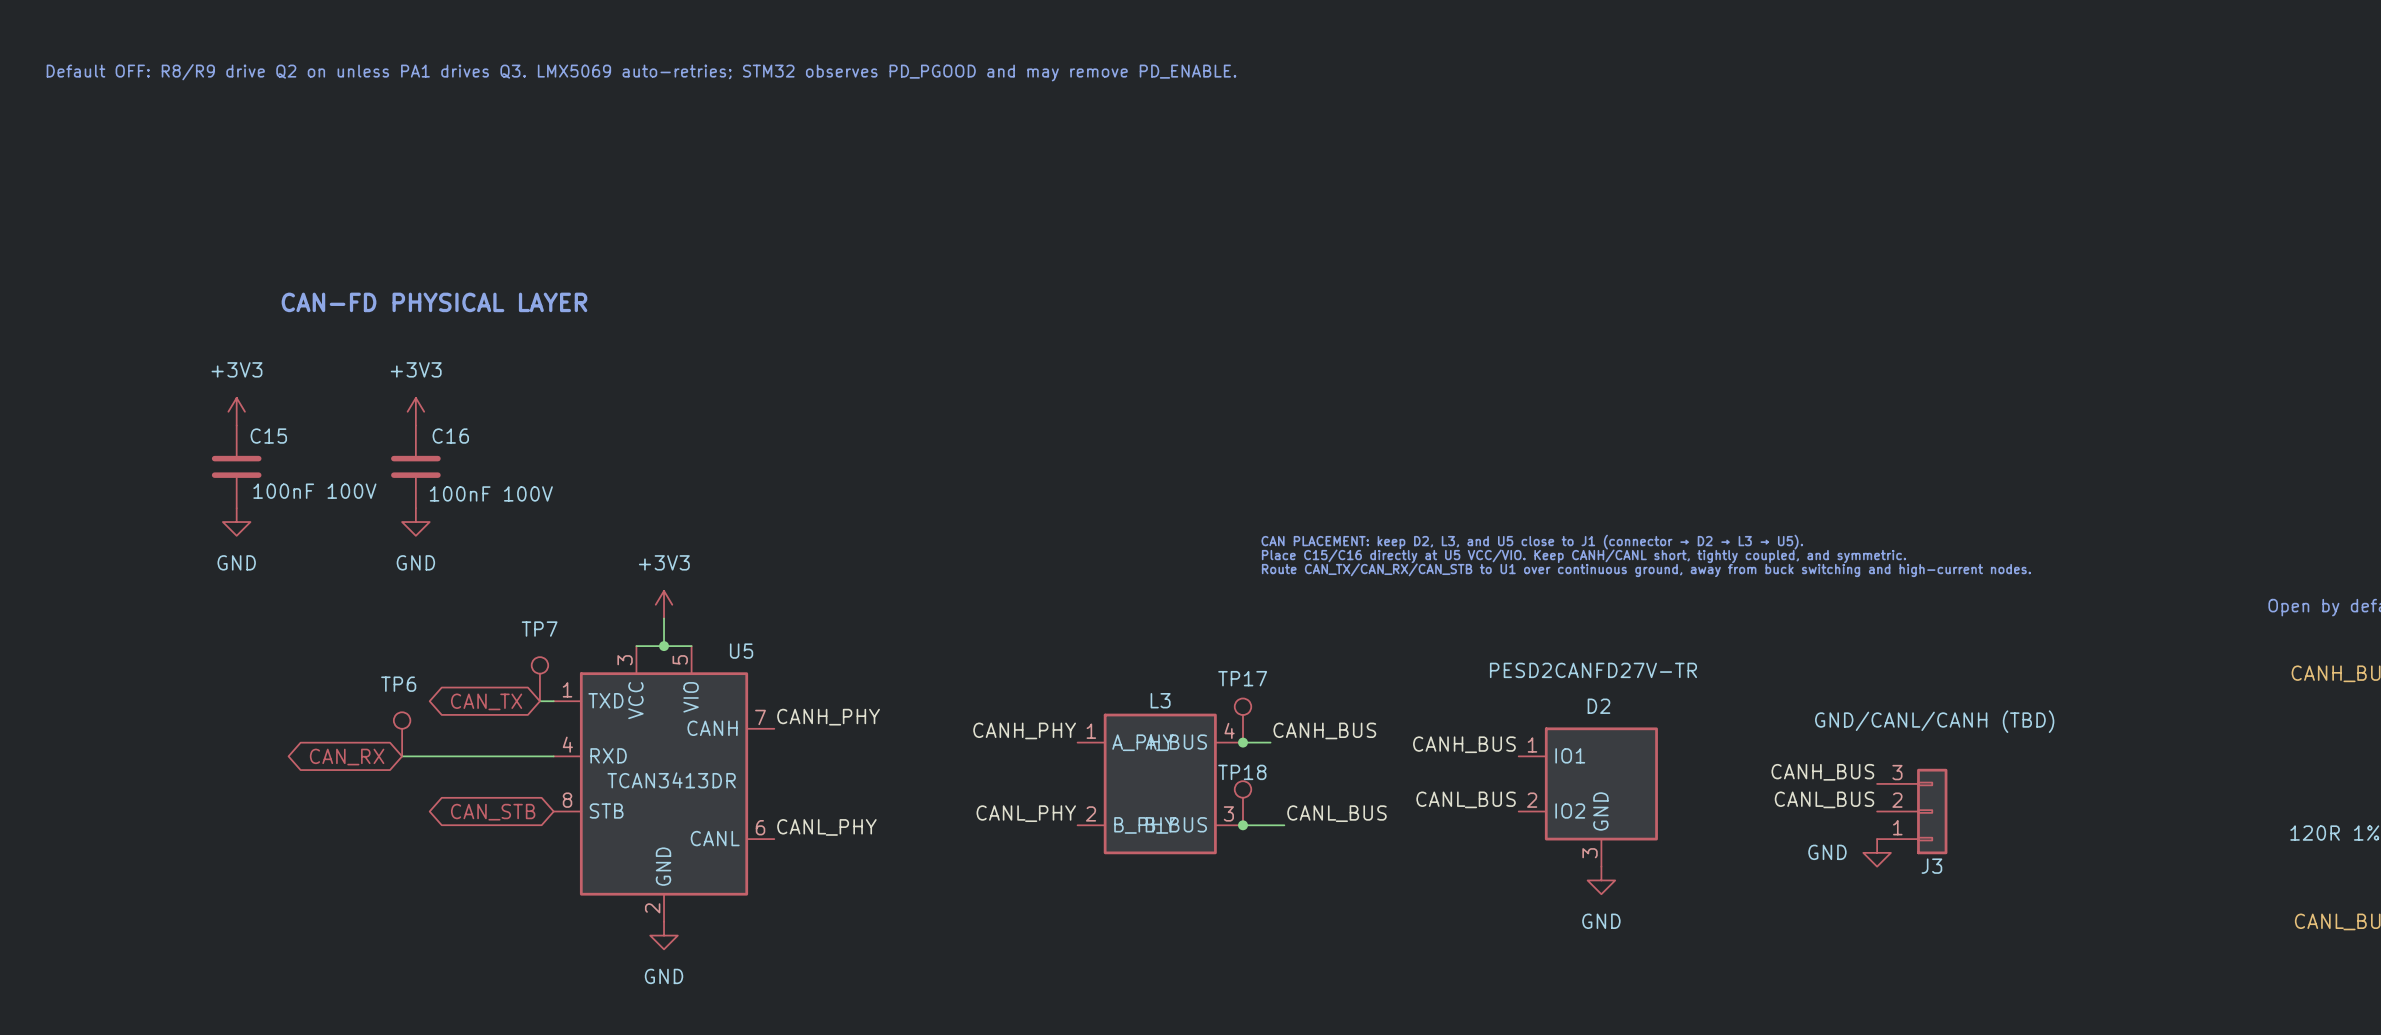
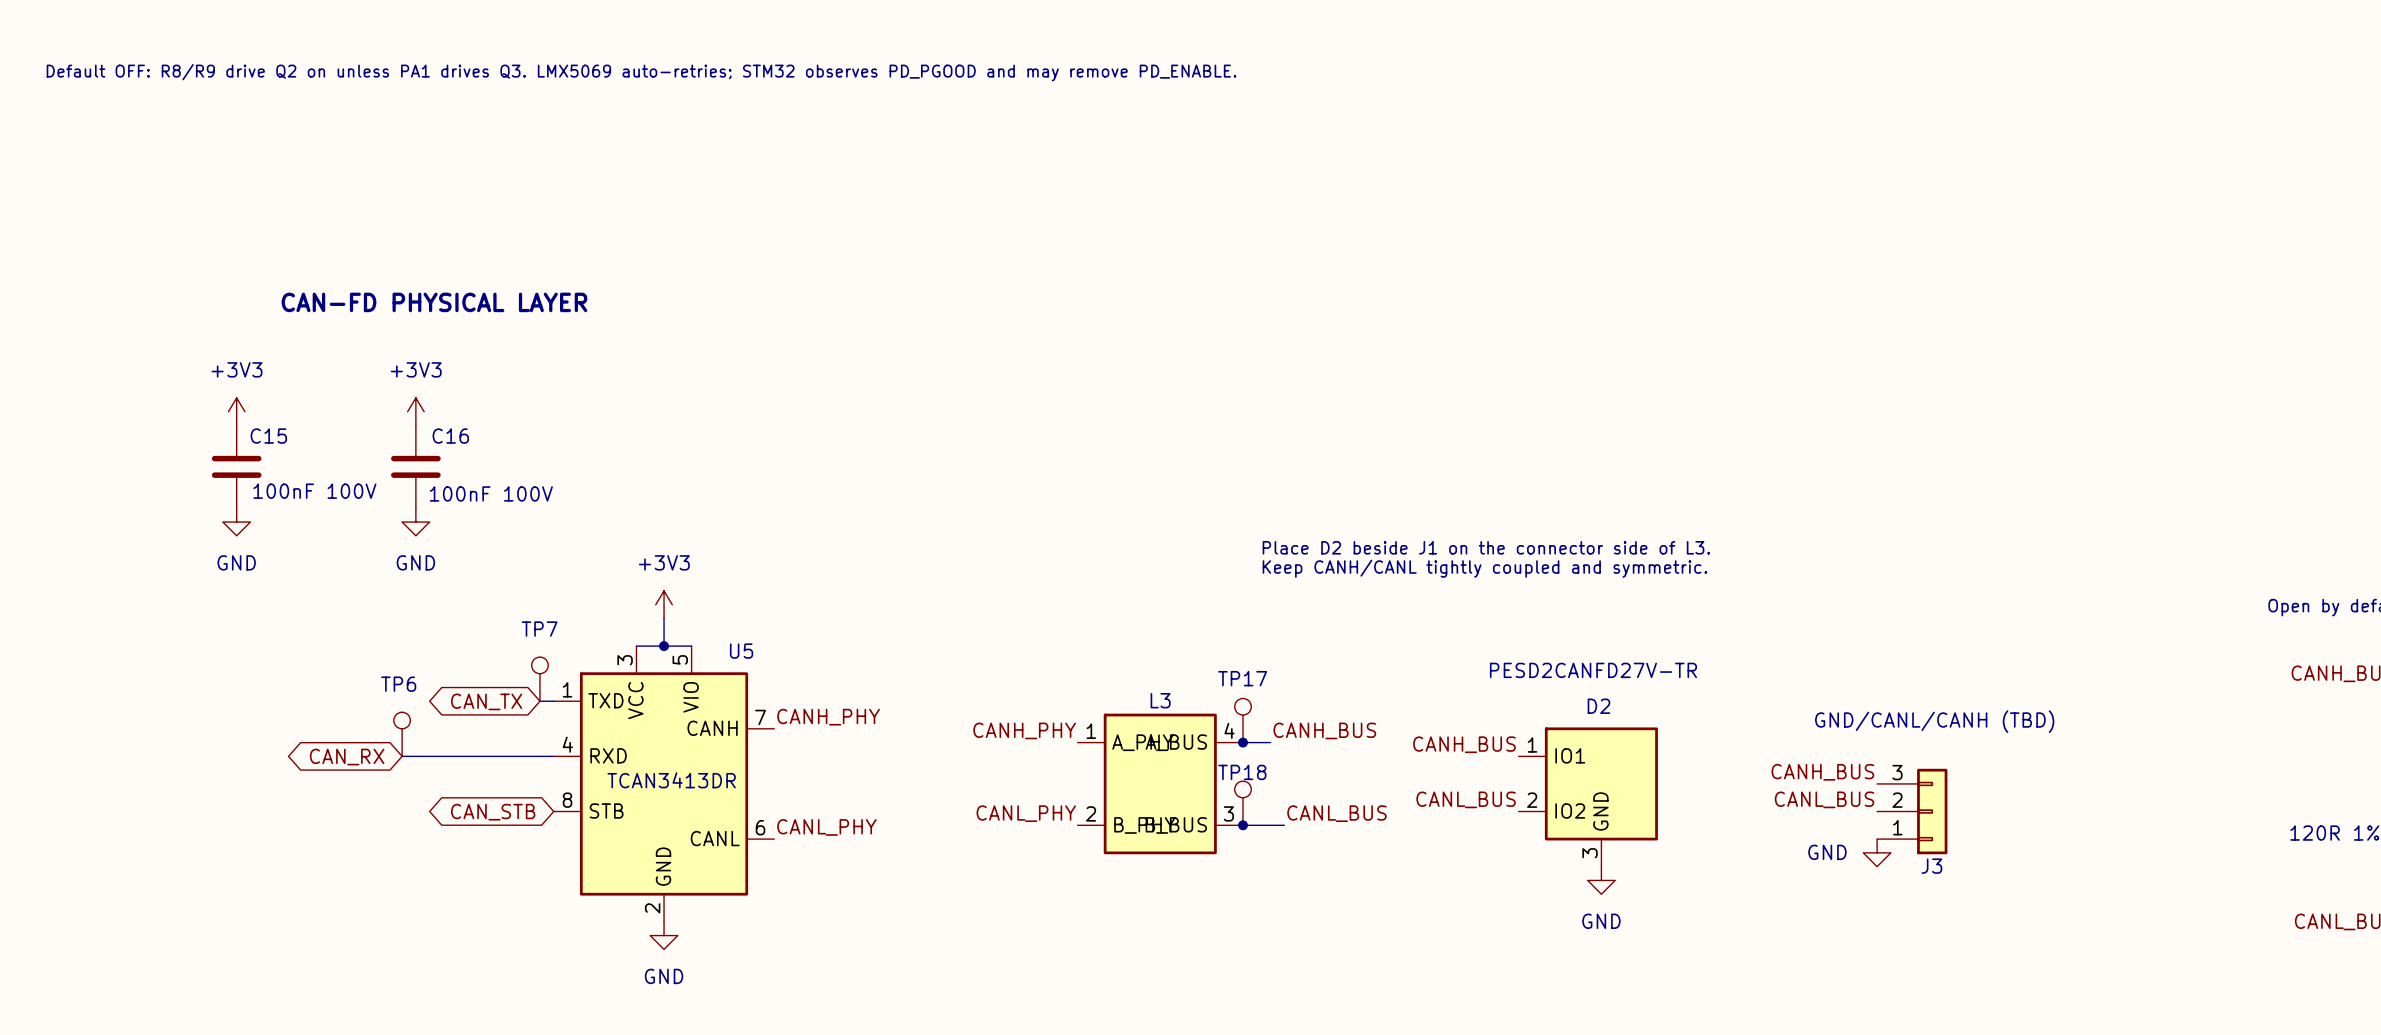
text: CAN PLACEMENT: keep D2, L3, and U5 close to J1 (connector → D2 → L3 → U5). (1532, 542) -> none
text: none -> Place D2 beside J1 on the connector side of L3. (1486, 547)
text: Place C15/C16 directly at U5 VCC/VIO. Keep CANH/CANL short, tightly coupled, and symmetric. (1583, 556) -> none
text: Route CAN_TX/CAN_RX/CAN_STB to U1 over continuous ground, away from buck switching and high-current nodes. (1646, 570) -> Keep CANH/CANL tightly coupled and symmetric. (1484, 568)

